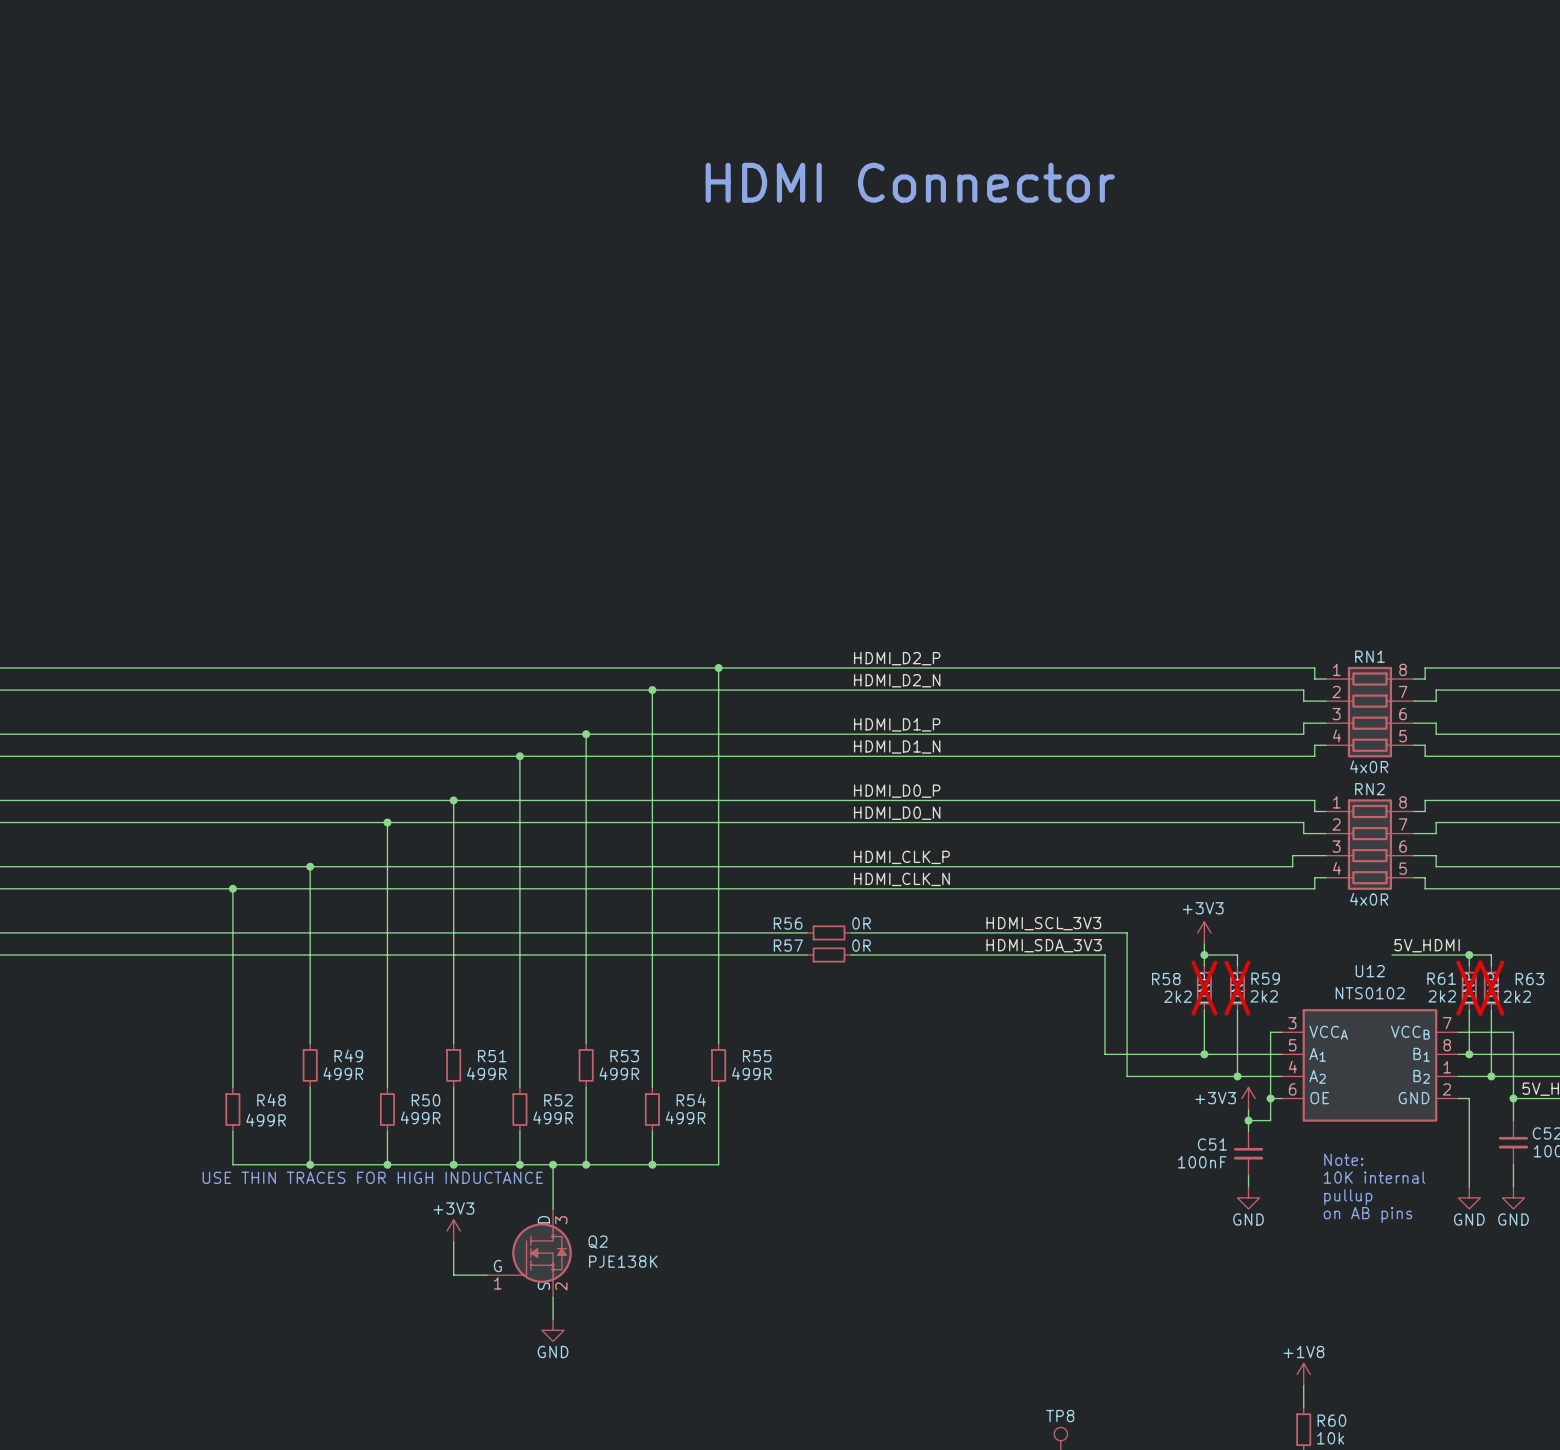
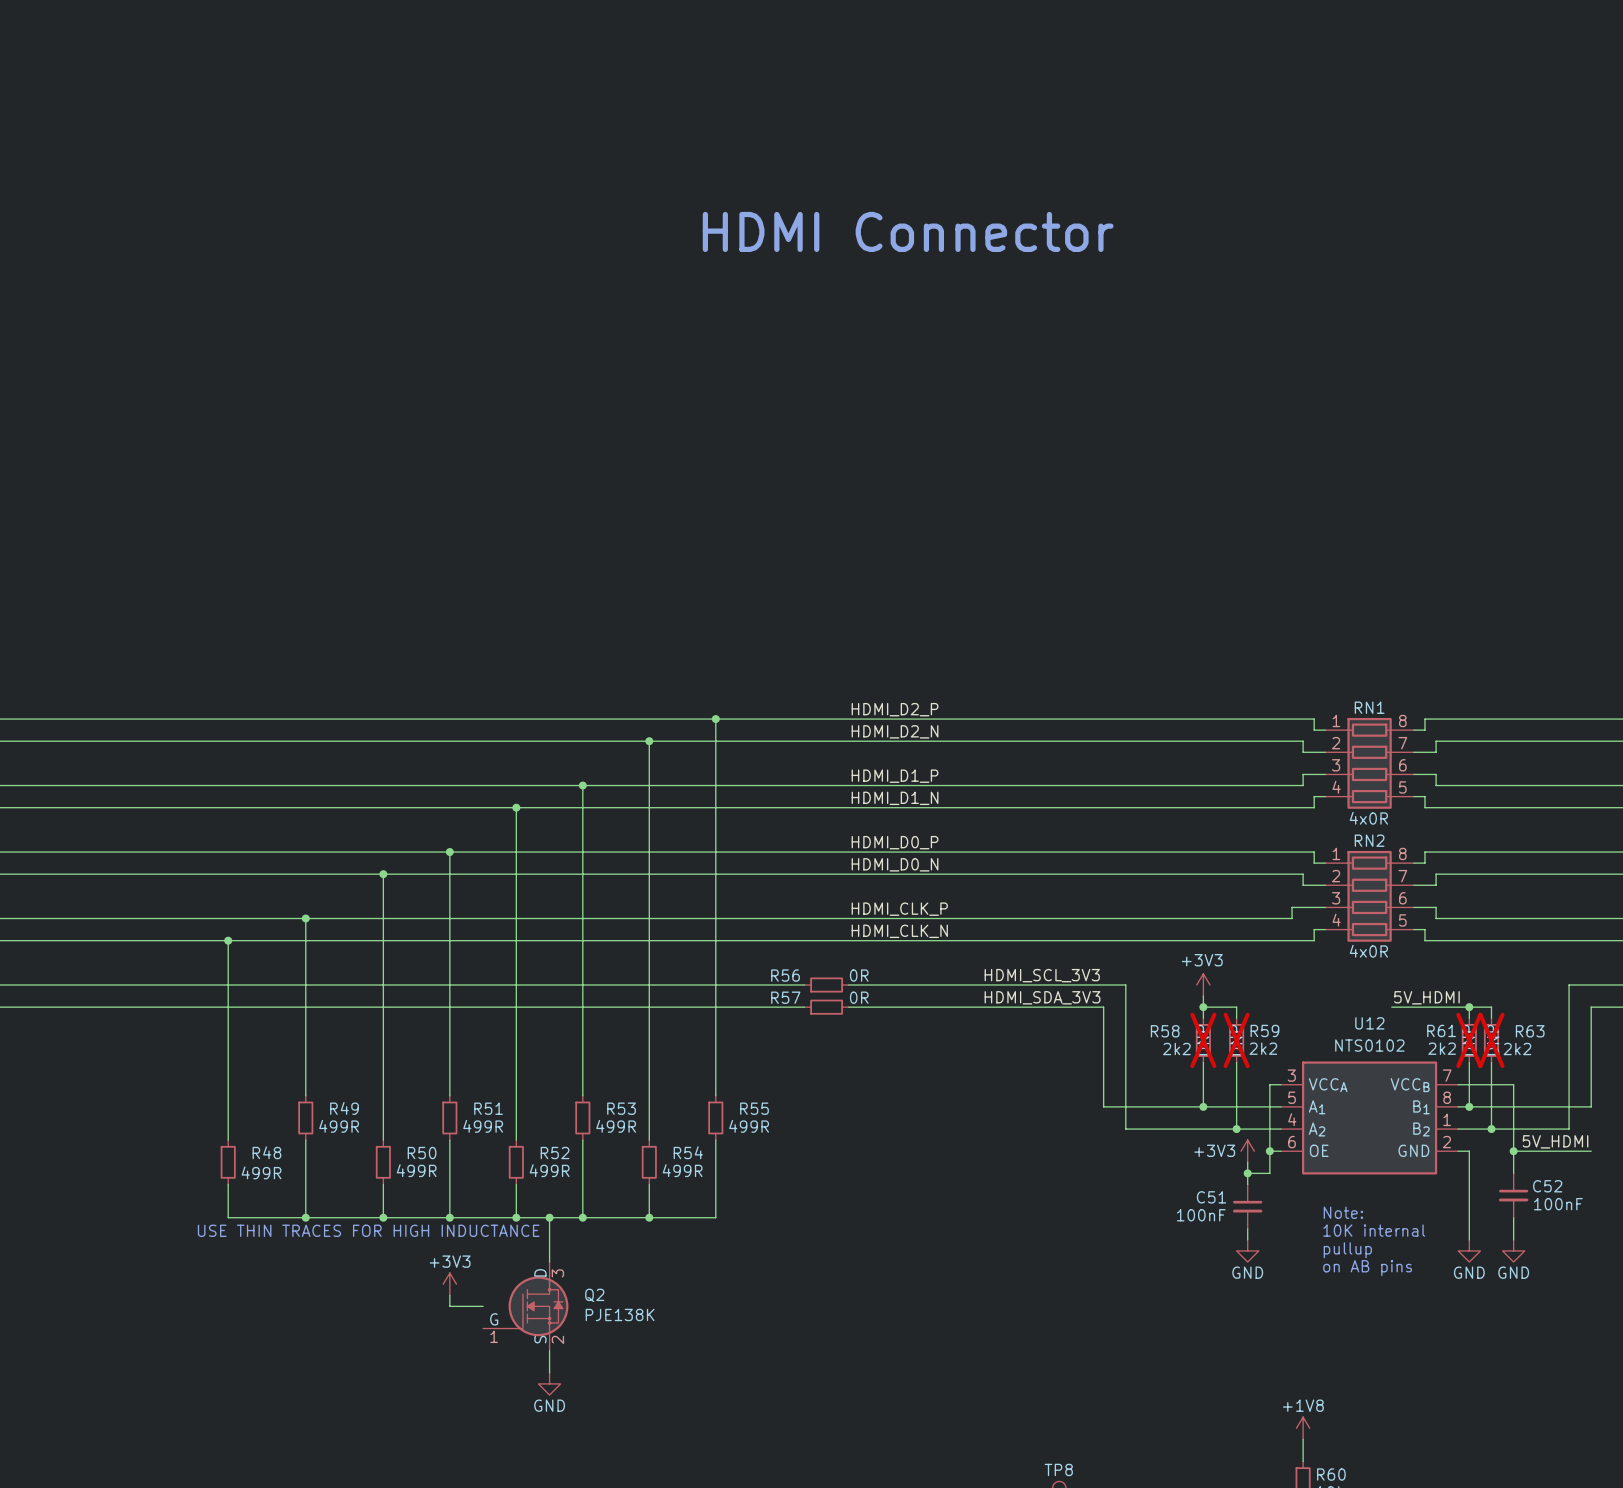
wire: (453, 1253) (453, 1275) (486, 1275) -> (449, 1306) (483, 1306)

